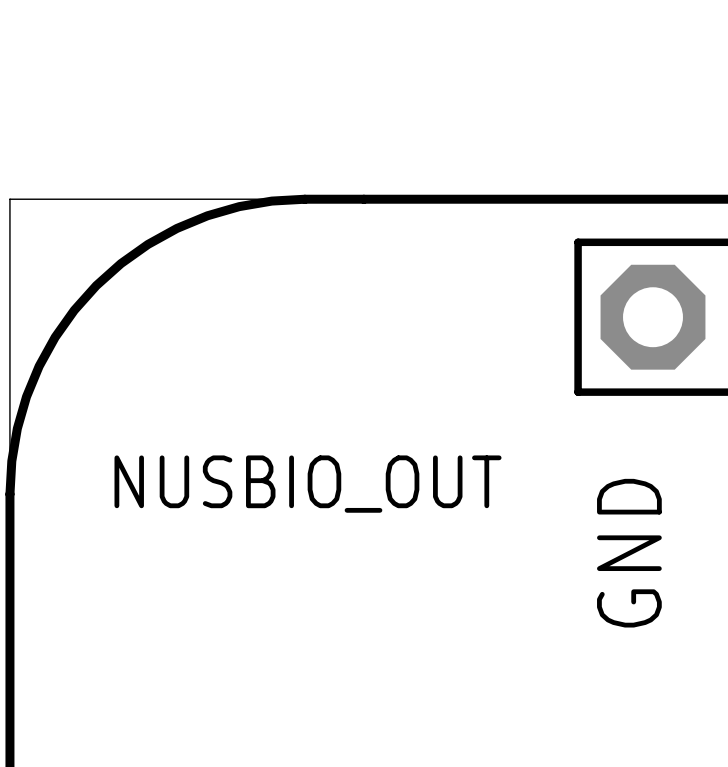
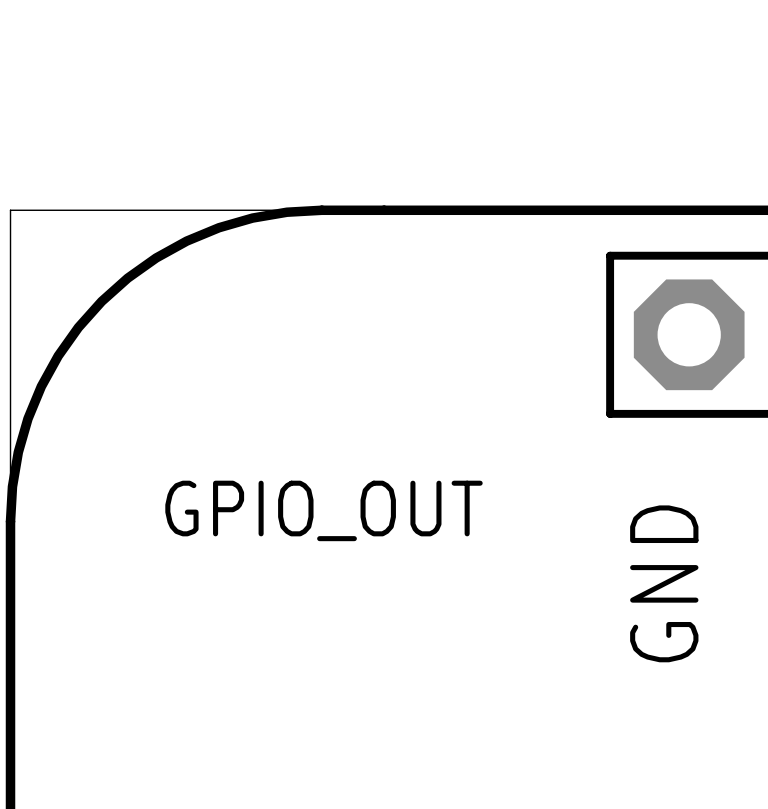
NUSBIO_OUT name: NUSBIO_OUT (308, 484) -> GPIO_OUT (324, 510)

